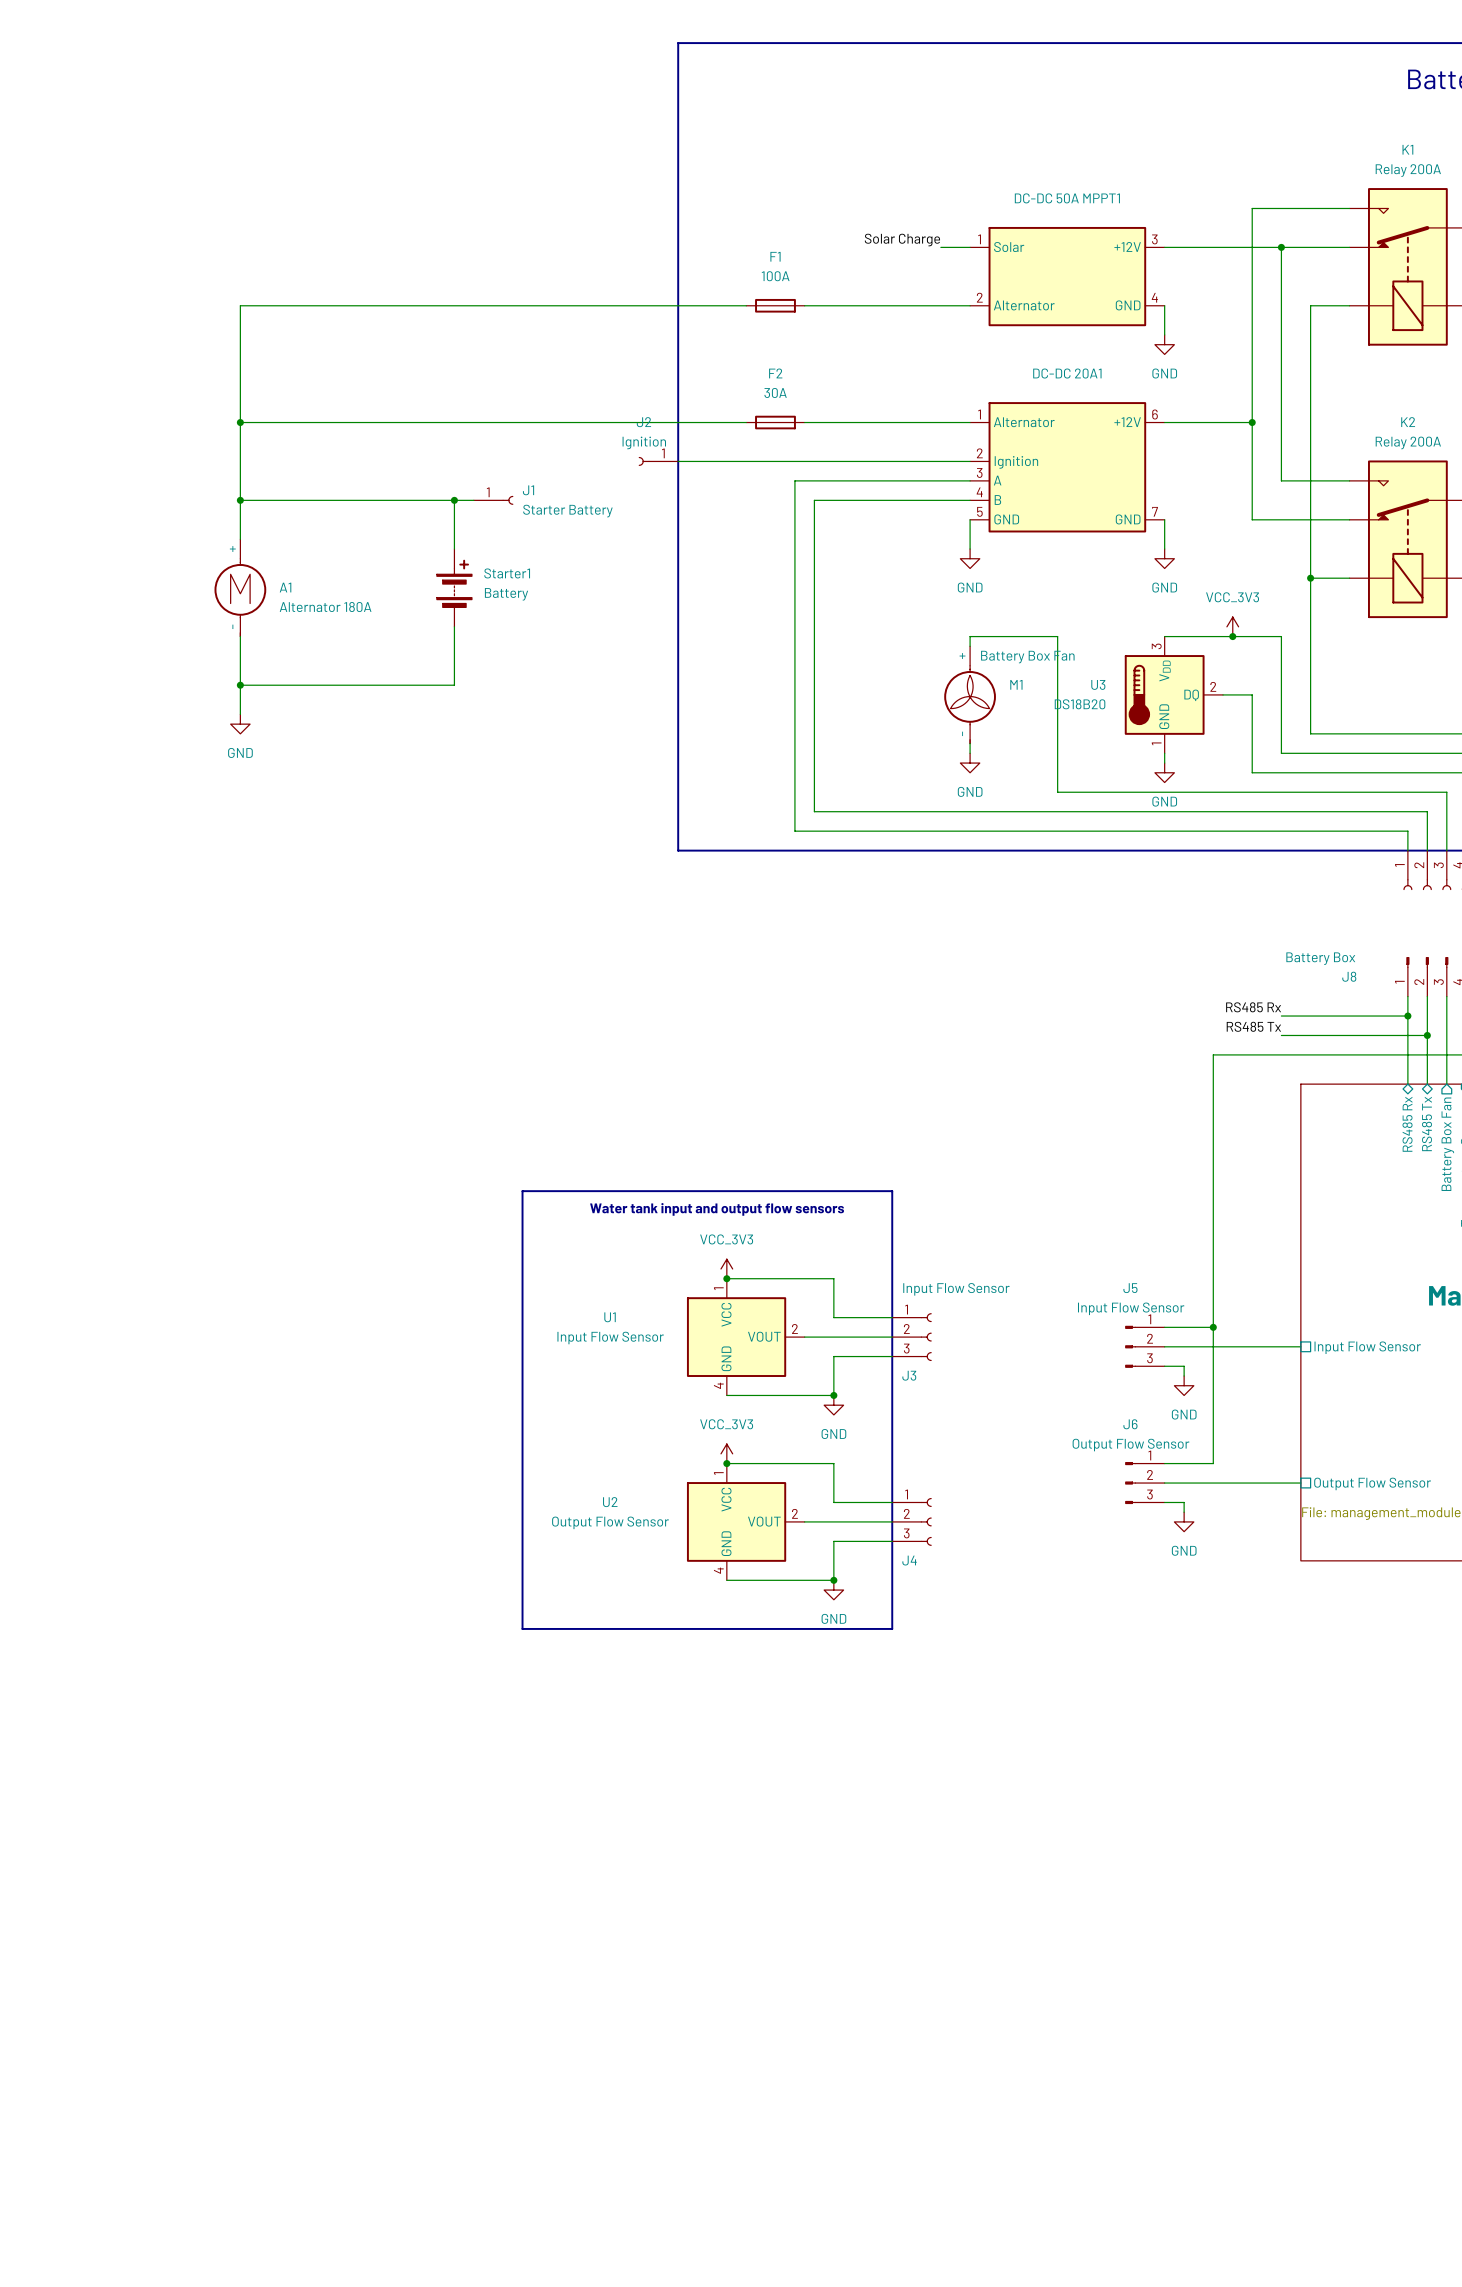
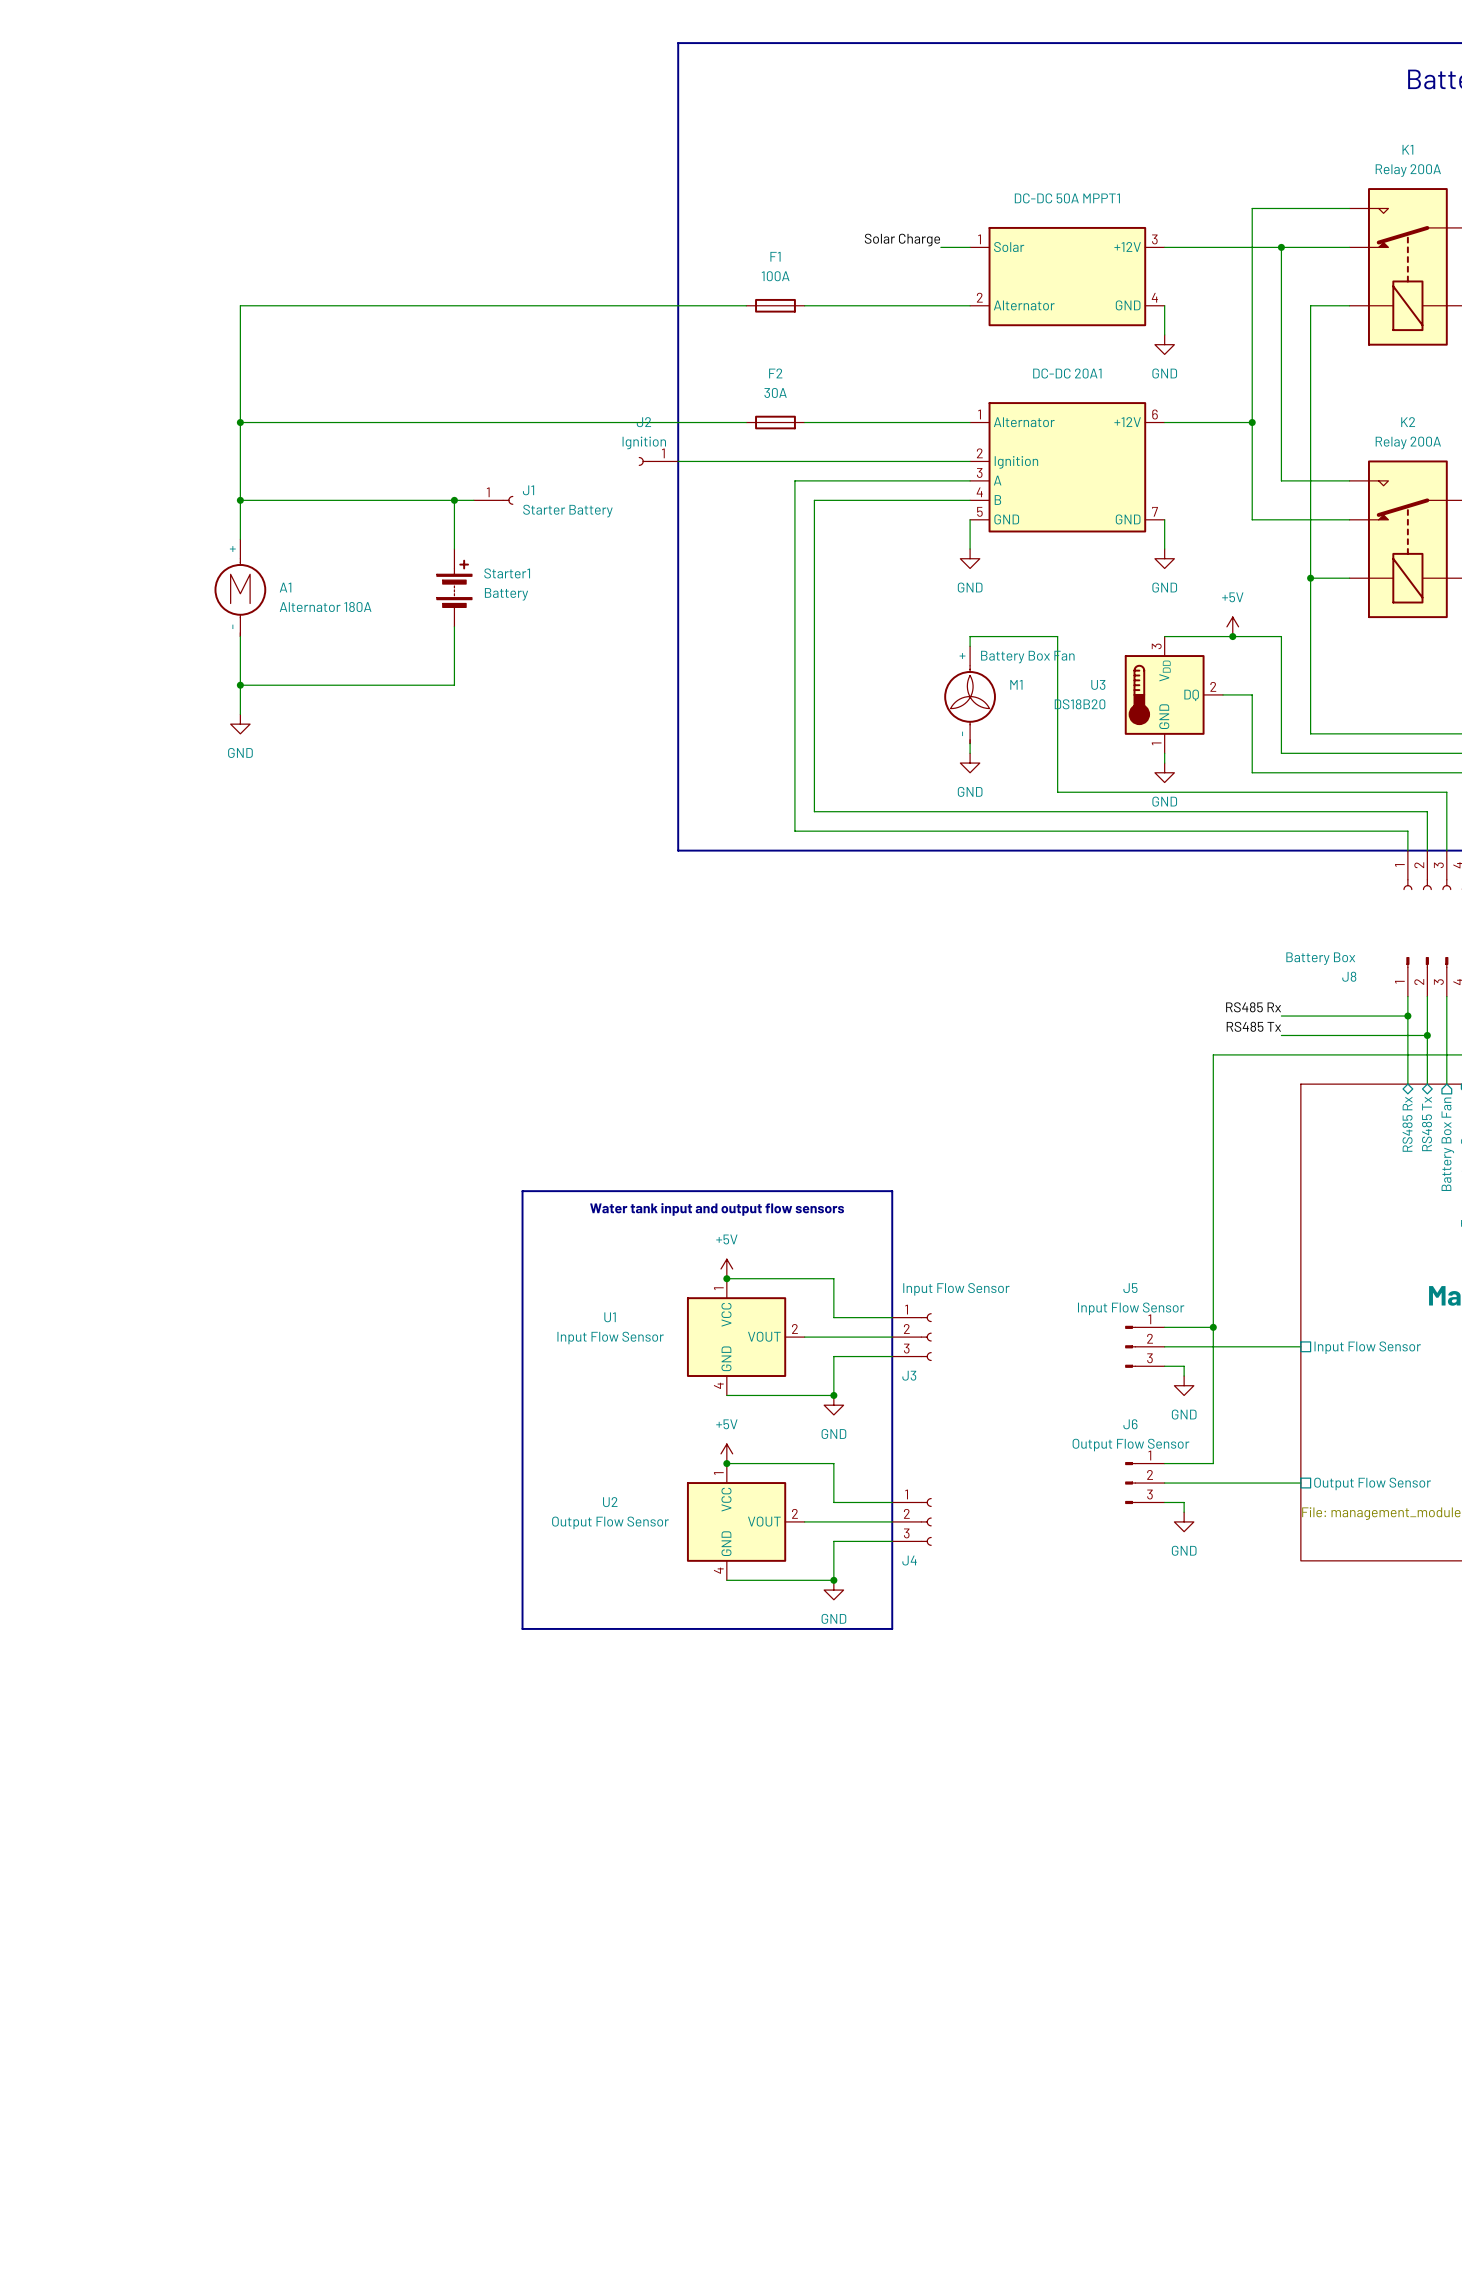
power symbol: VCC_3V3 (1232, 626) -> +5V (1232, 626)
power symbol: VCC_3V3 (726, 1268) -> +5V (726, 1268)
power symbol: VCC_3V3 (726, 1453) -> +5V (726, 1453)

